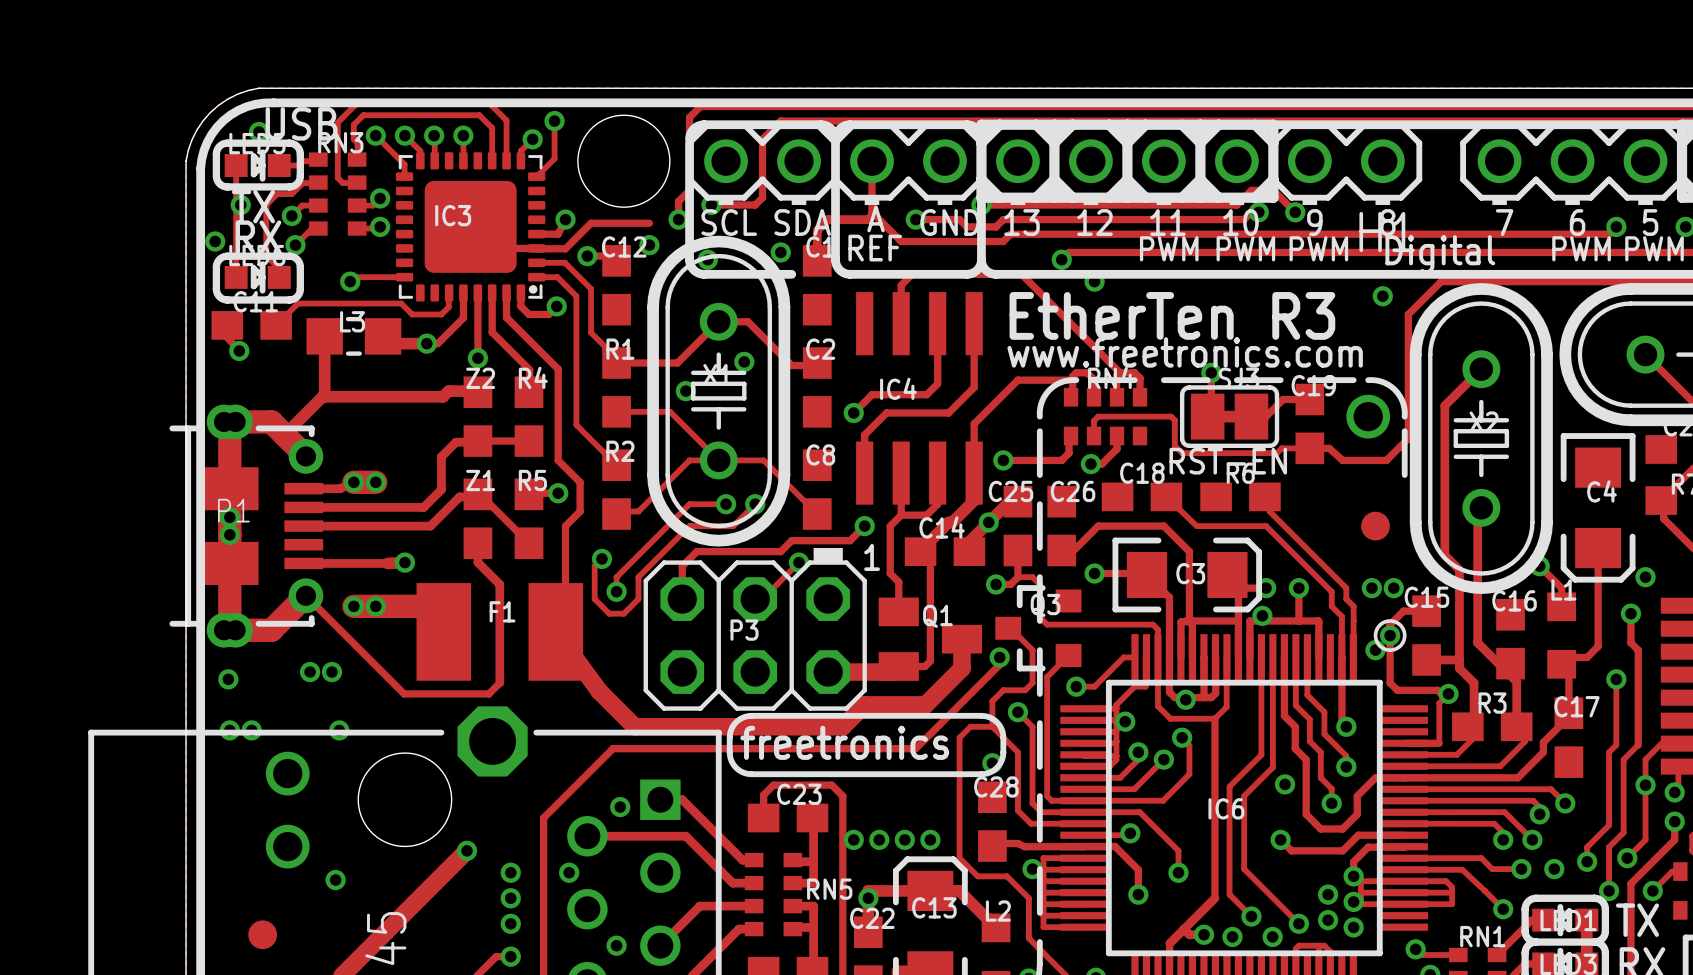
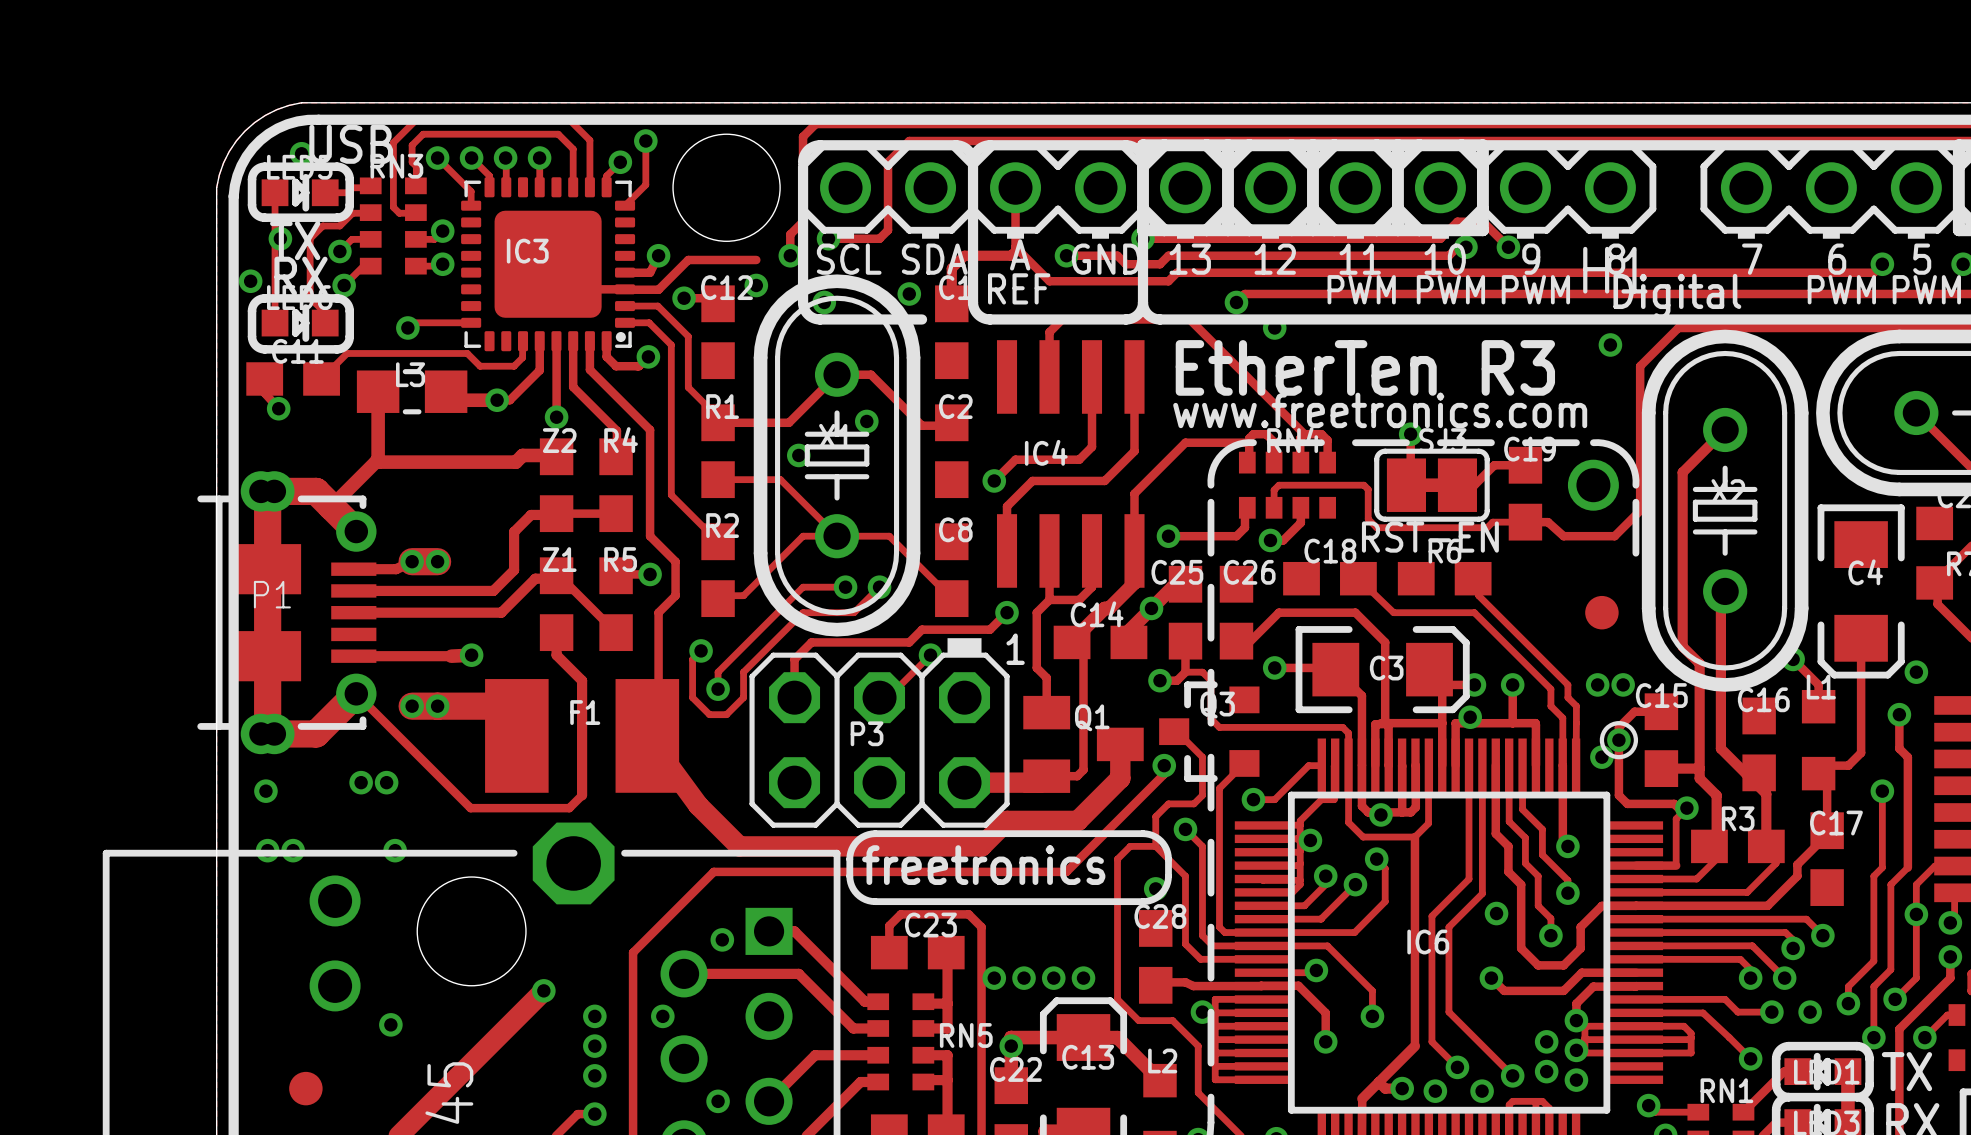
via: (229, 517) -> none
via: (229, 534) -> none

